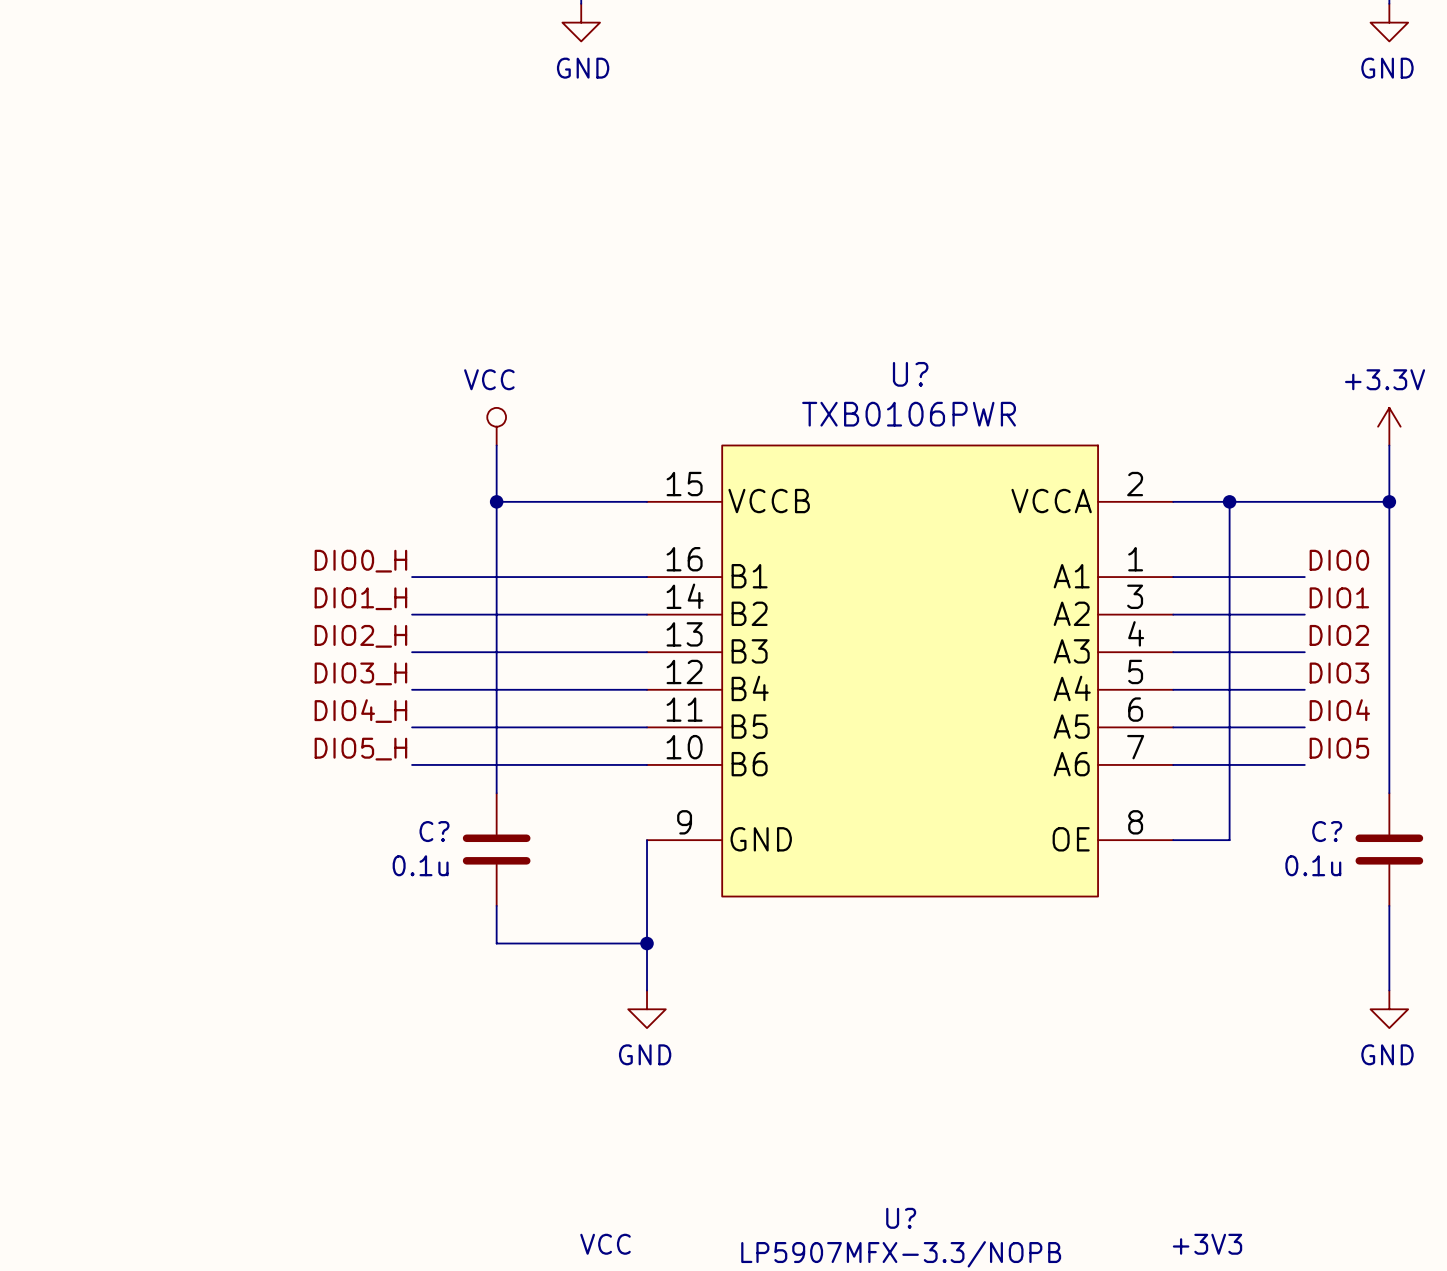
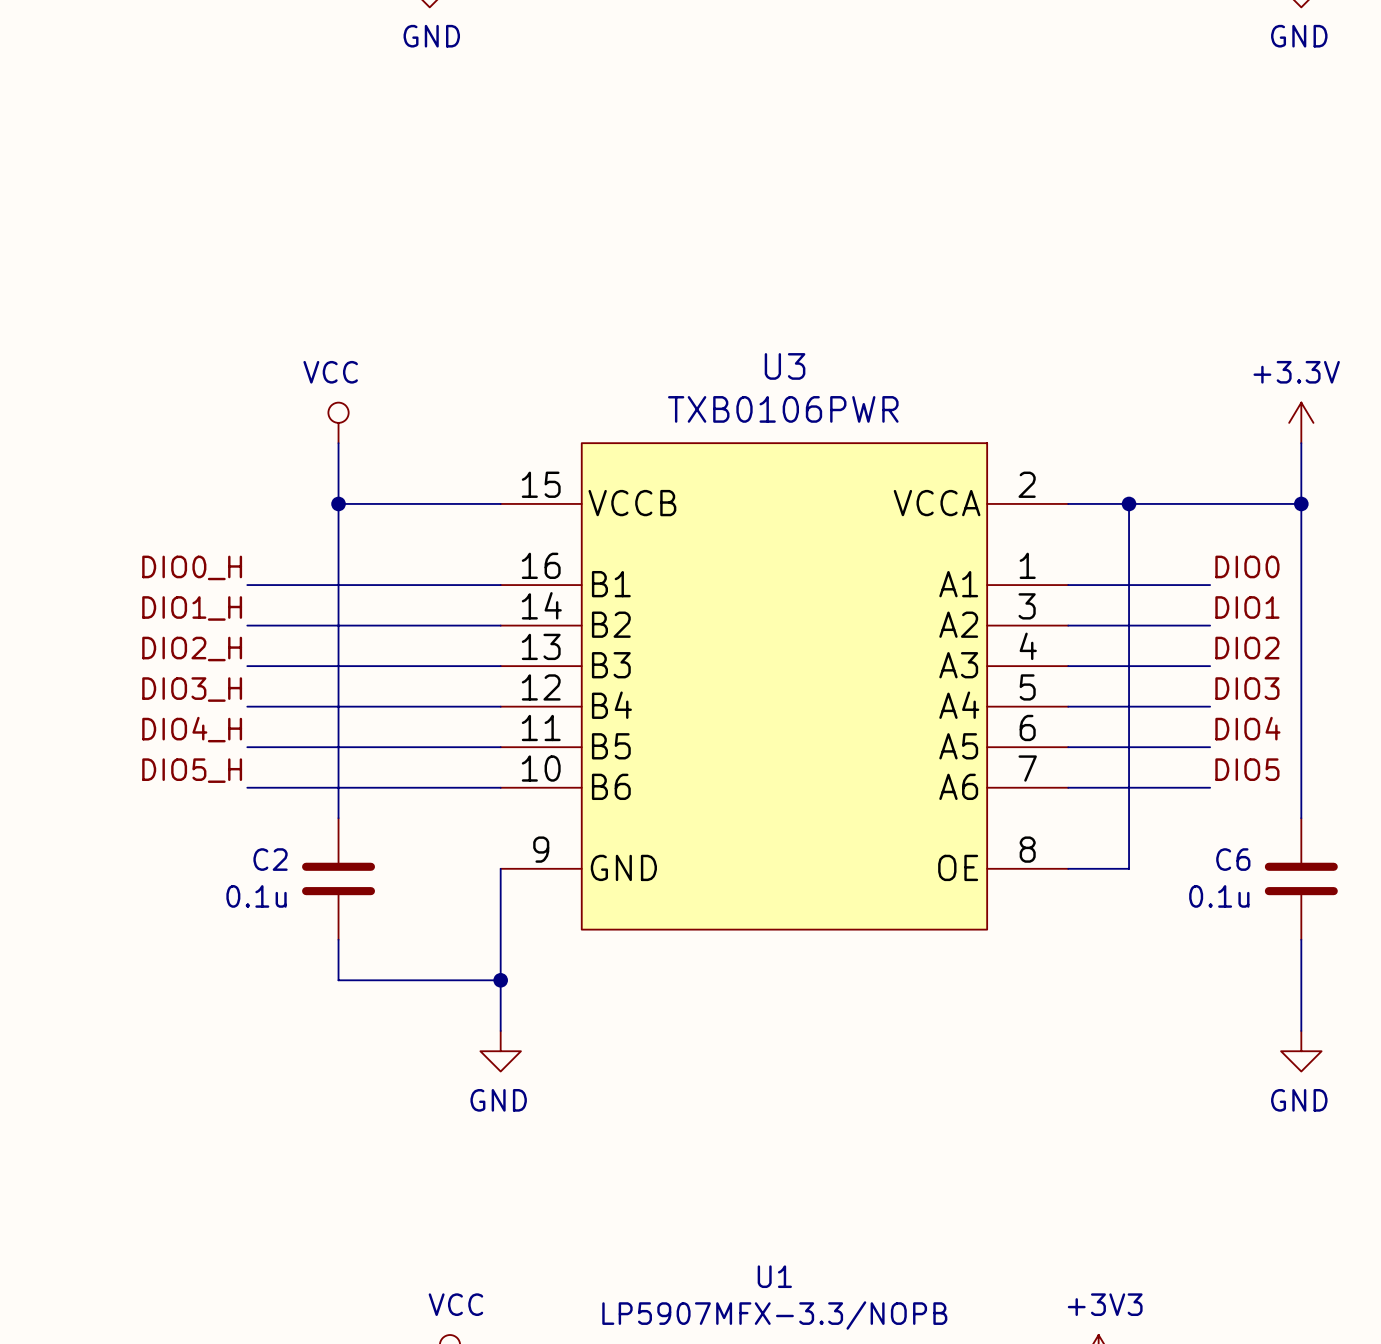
U? name: U? (910, 374) -> U3 (785, 366)
C? name: C? (434, 831) -> C2 (270, 859)
C? name: C? (1327, 831) -> C6 (1233, 859)
U? name: U? (901, 1218) -> U1 (774, 1276)

